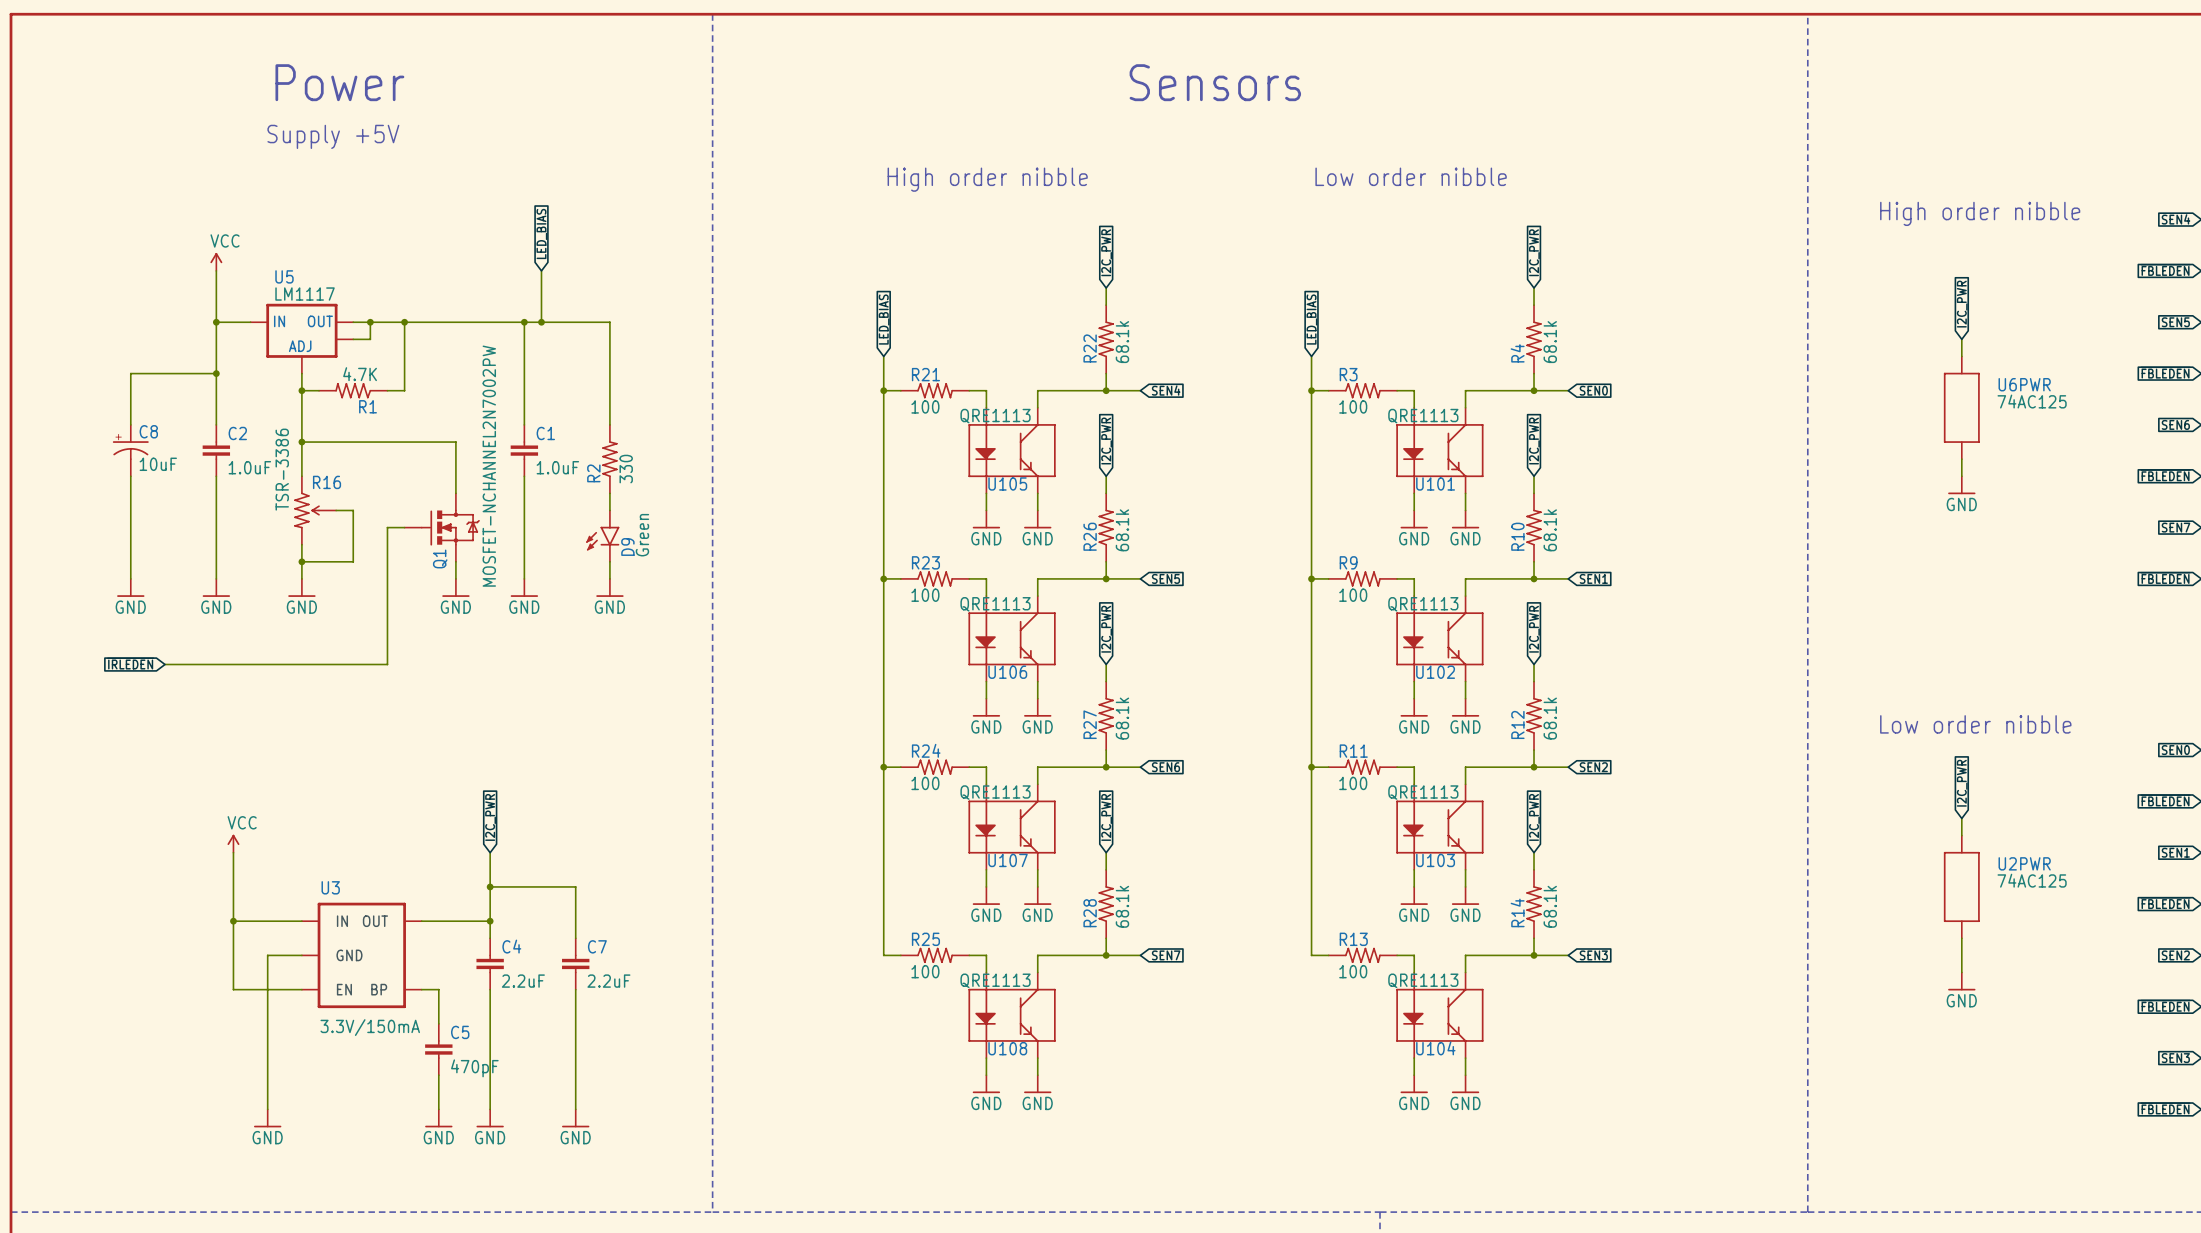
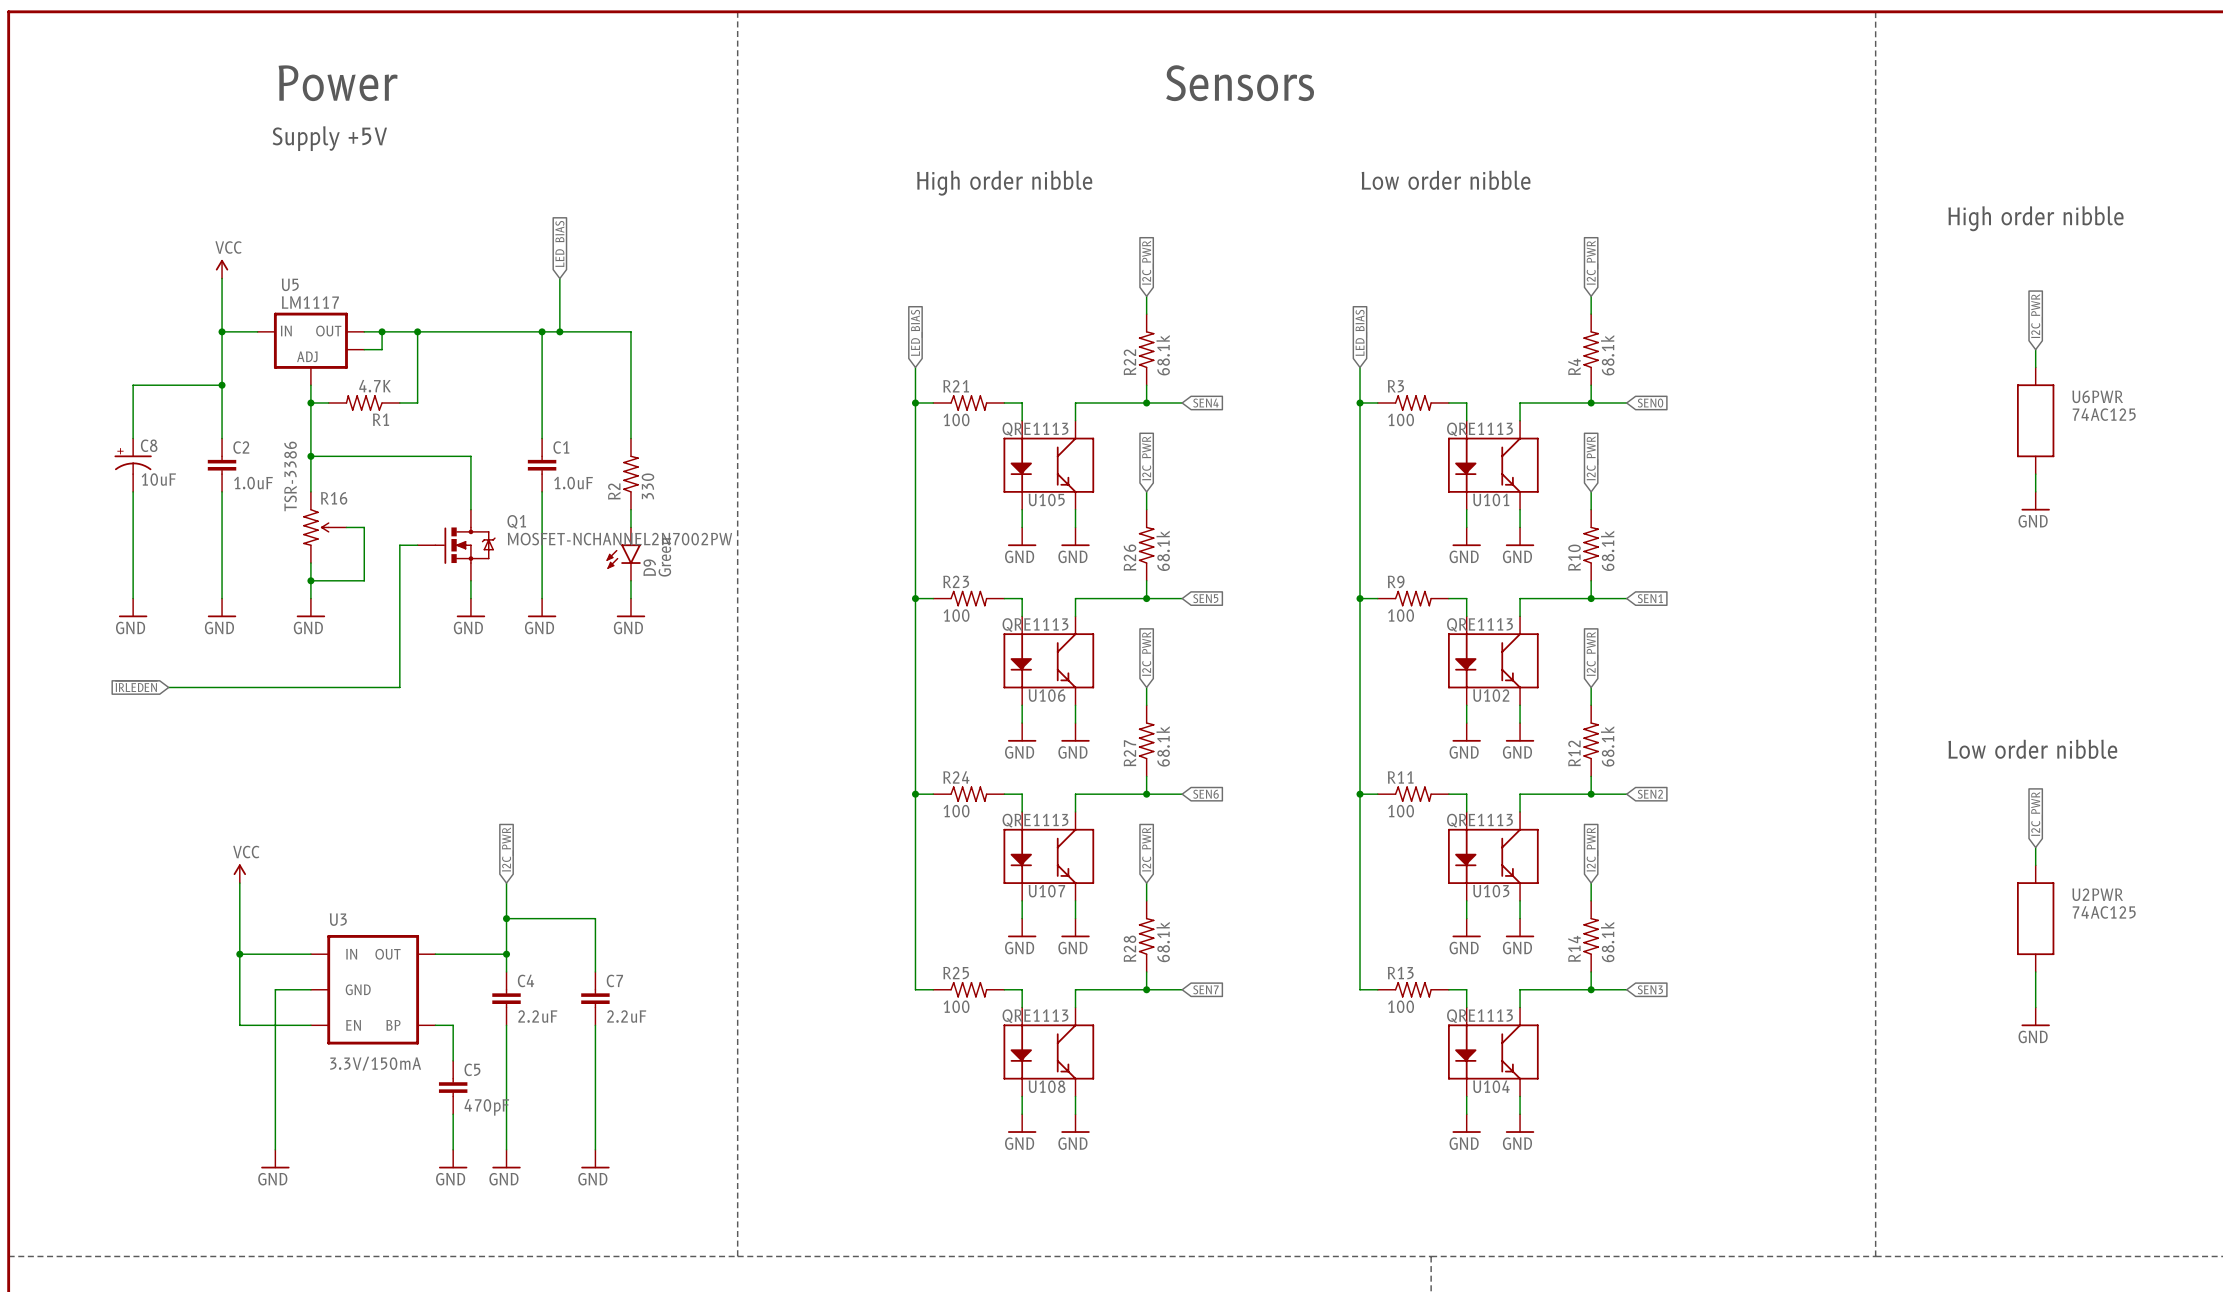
Q1 value rotation: 0° (489, 466) -> 90° clockwise (619, 539)
Q1 name rotation: 0° (440, 558) -> 90° clockwise (516, 521)
Q1 name position: Q1 (440, 558) -> Q1 (516, 521)

